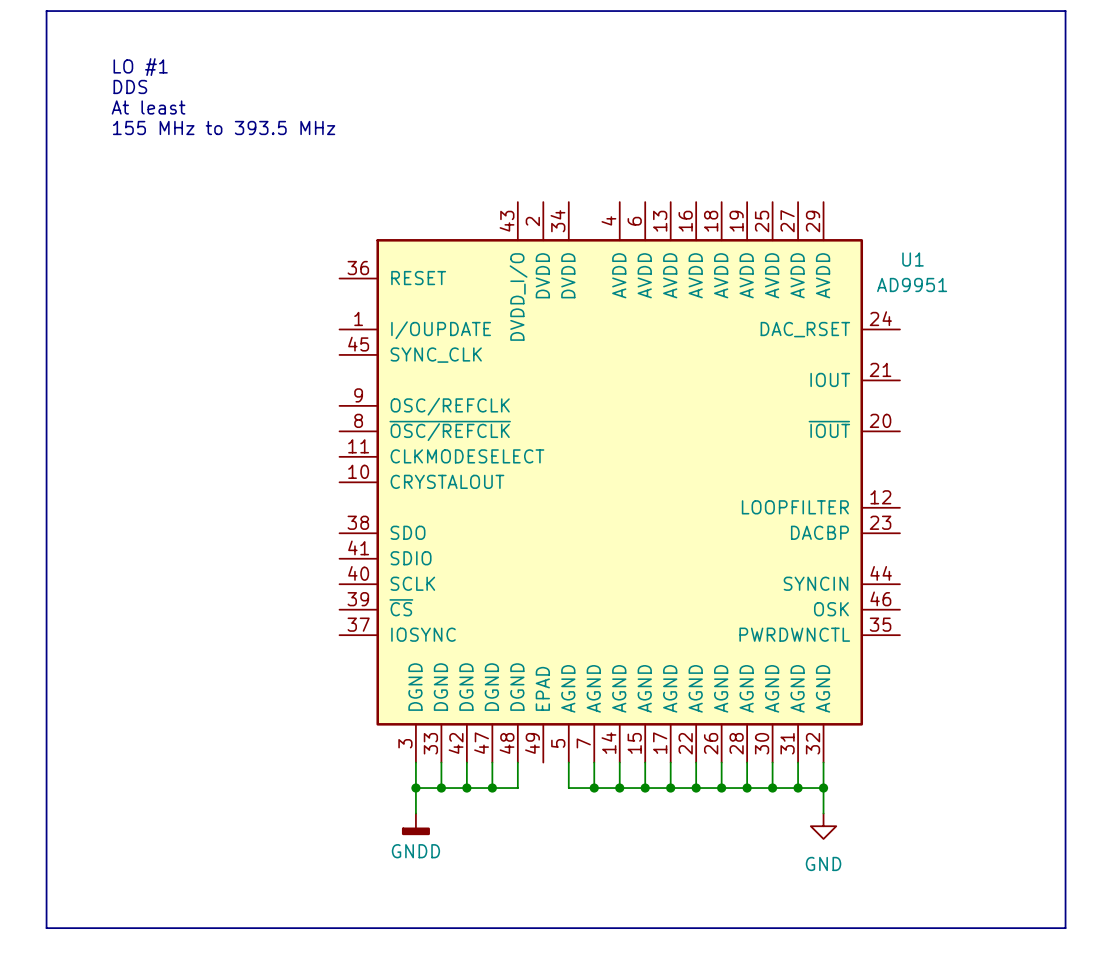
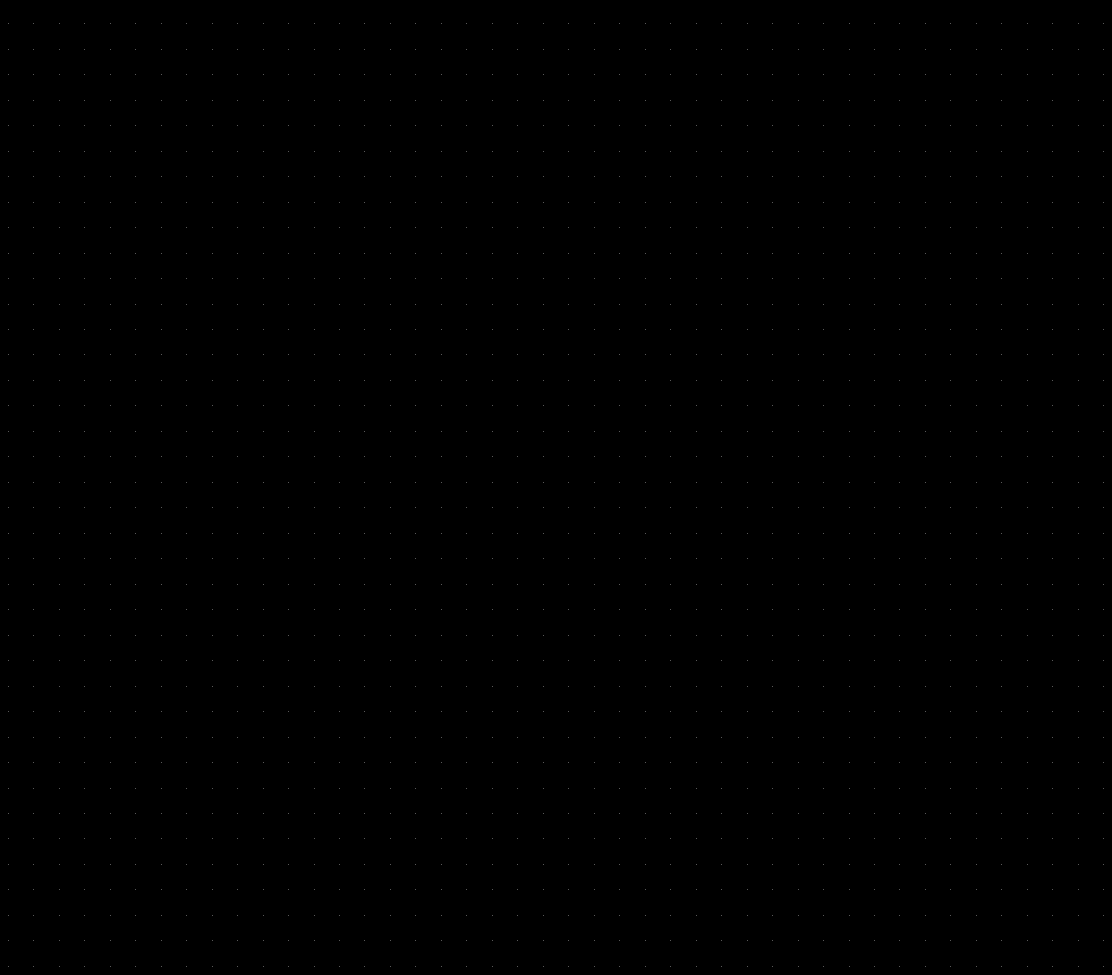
line: (46, 11) (1065, 11) (1065, 928) (46, 928) (46, 11) -> none
text: LO #1 (140, 67) -> none
text: DDS (130, 86) -> none
text: At least (148, 107) -> none
text: 155 MHz to 393.5 MHz (224, 127) -> none
U1: AD9951 (619, 482) -> none
wire: (415, 762) (415, 813) -> none
wire: (441, 762) (441, 788) -> none
wire: (466, 762) (466, 788) -> none
wire: (492, 762) (492, 788) -> none
wire: (517, 762) (517, 788) (415, 788) -> none
wire: (568, 762) (568, 788) (823, 788) -> none
wire: (594, 762) (594, 788) -> none
wire: (619, 762) (619, 788) -> none
wire: (645, 762) (645, 788) -> none
wire: (670, 762) (670, 788) -> none
wire: (696, 762) (696, 788) -> none
wire: (721, 762) (721, 788) -> none
wire: (747, 762) (747, 788) -> none
wire: (772, 762) (772, 788) -> none
wire: (798, 762) (798, 788) -> none
wire: (823, 762) (823, 813) -> none
junction: (415, 788) -> none
junction: (441, 788) -> none
junction: (466, 788) -> none
junction: (492, 788) -> none
junction: (594, 788) -> none
junction: (619, 788) -> none
junction: (645, 788) -> none
junction: (670, 788) -> none
junction: (696, 788) -> none
junction: (721, 788) -> none
junction: (747, 788) -> none
junction: (772, 788) -> none
junction: (798, 788) -> none
junction: (823, 788) -> none
power symbol: GNDD (415, 824) -> none
power symbol: GND (823, 826) -> none

